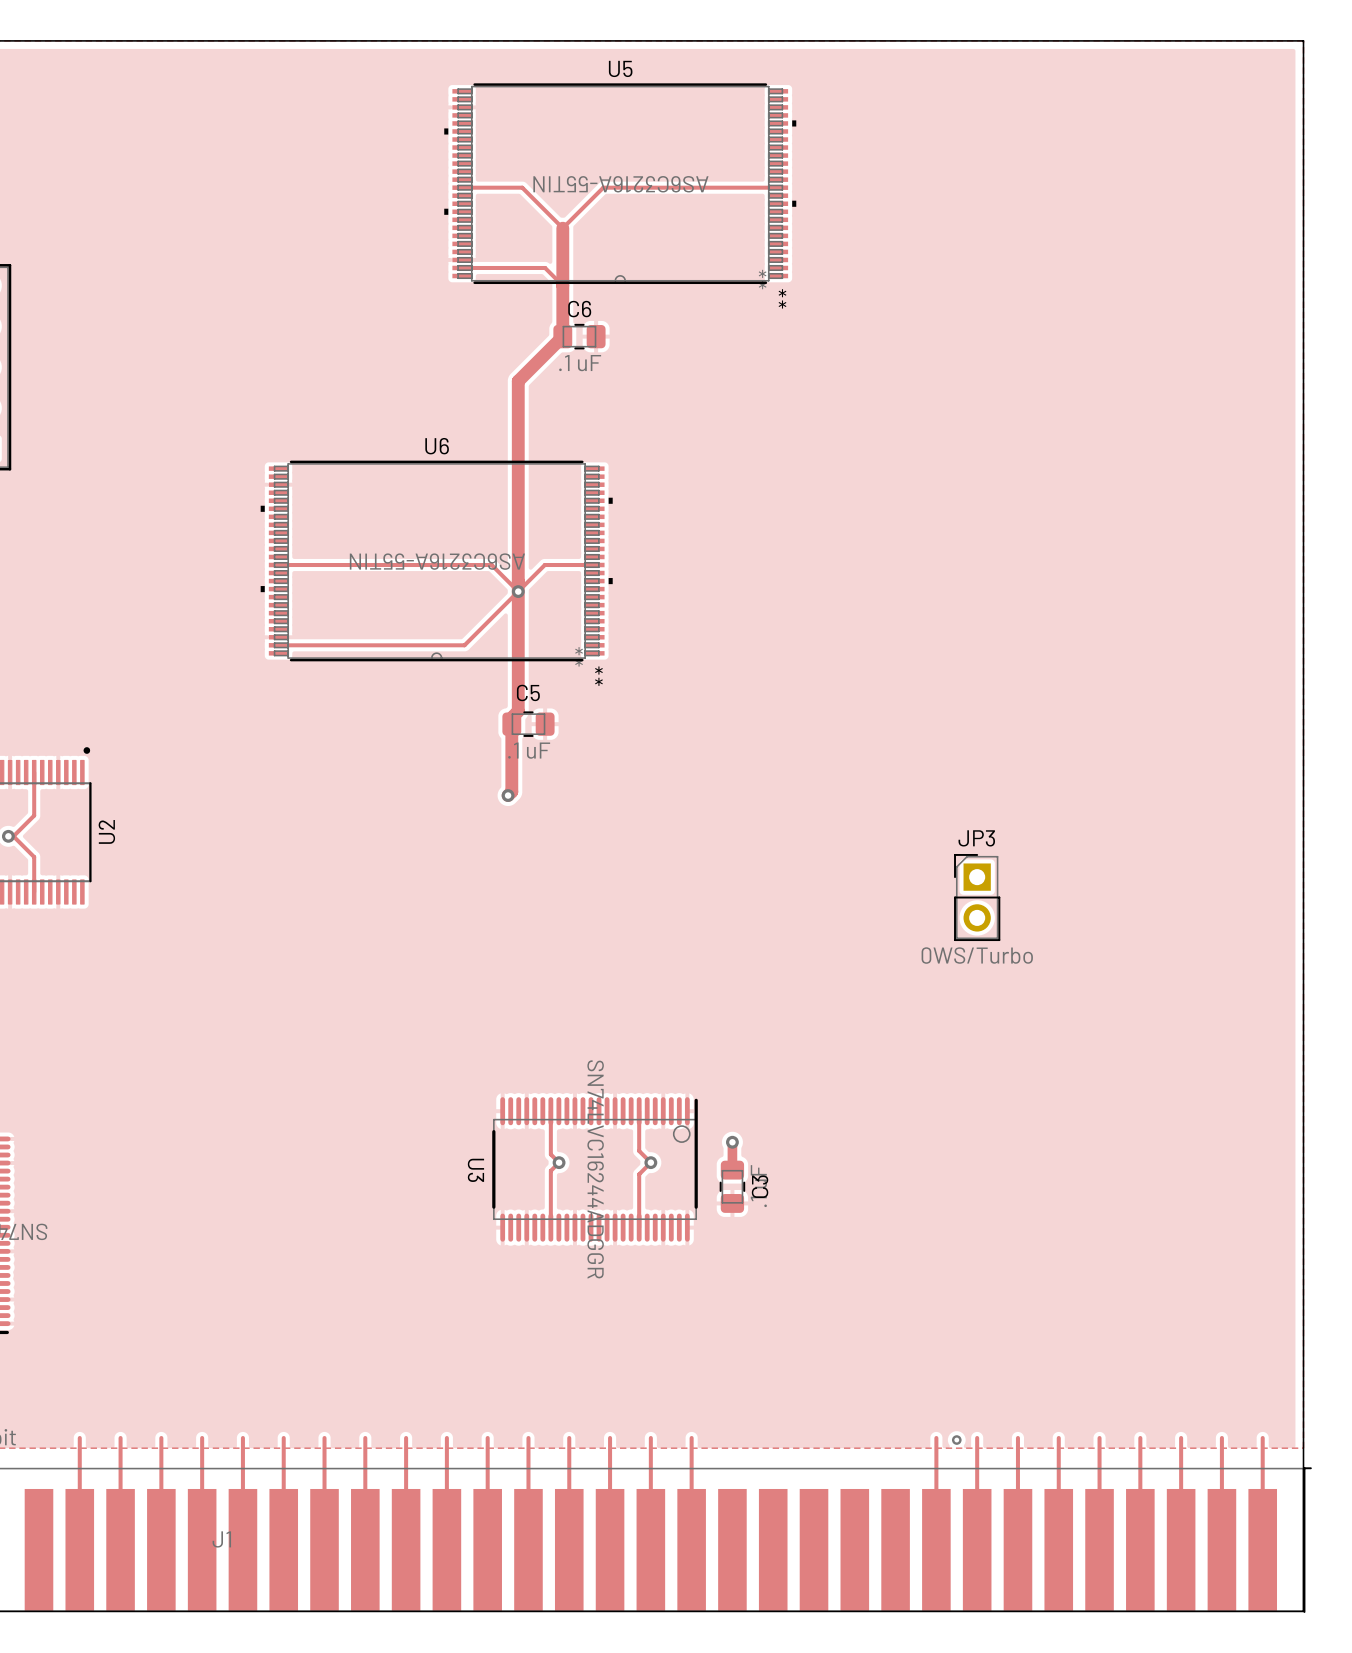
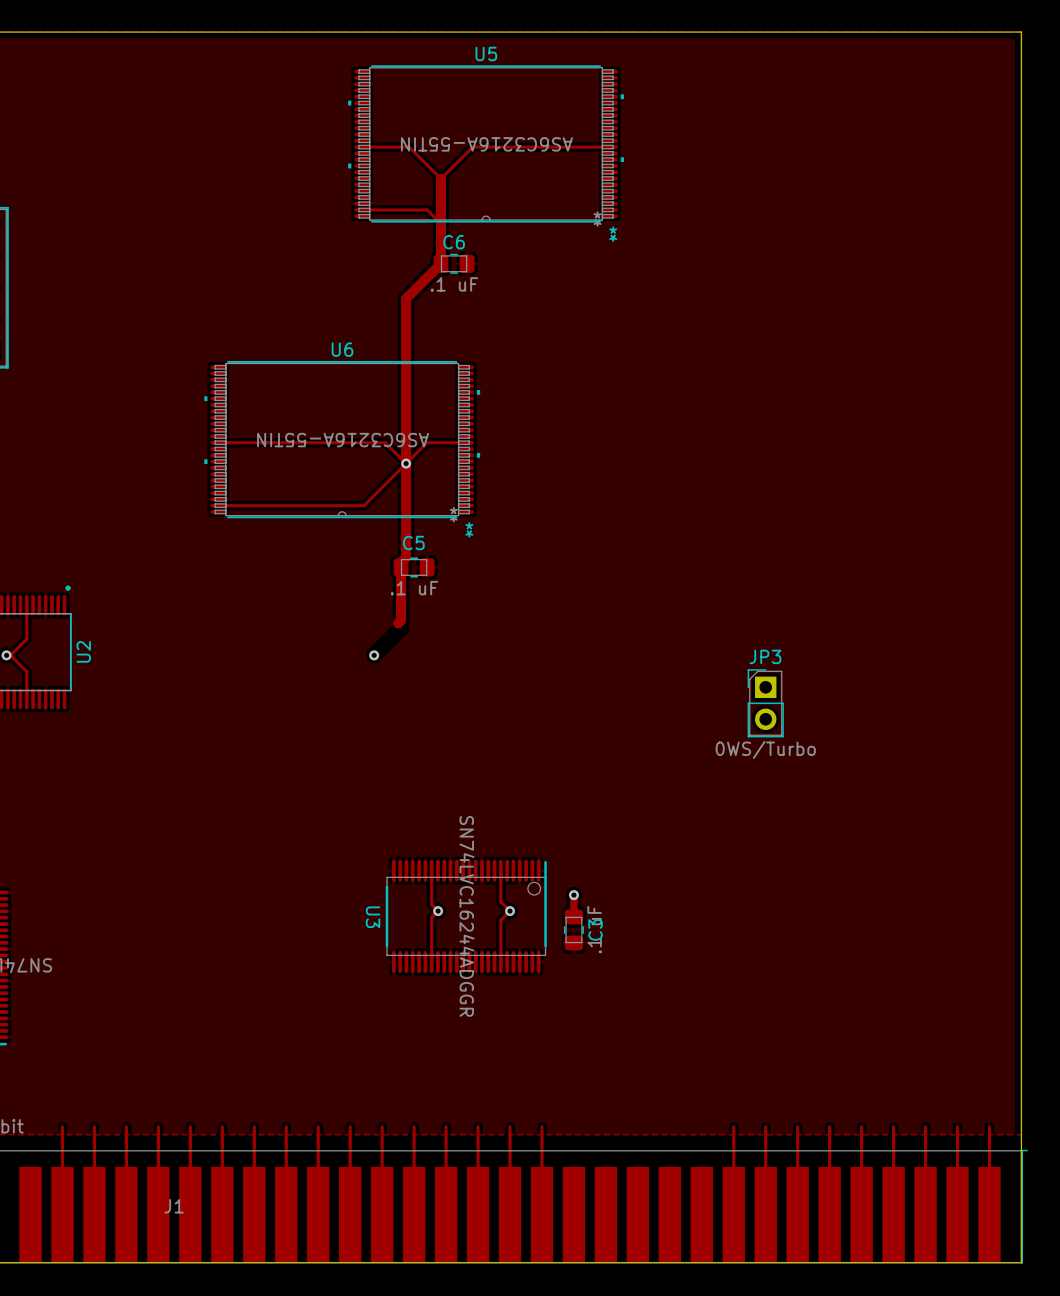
via position: (508, 795) -> (374, 655)
via: (956, 1440) -> none

